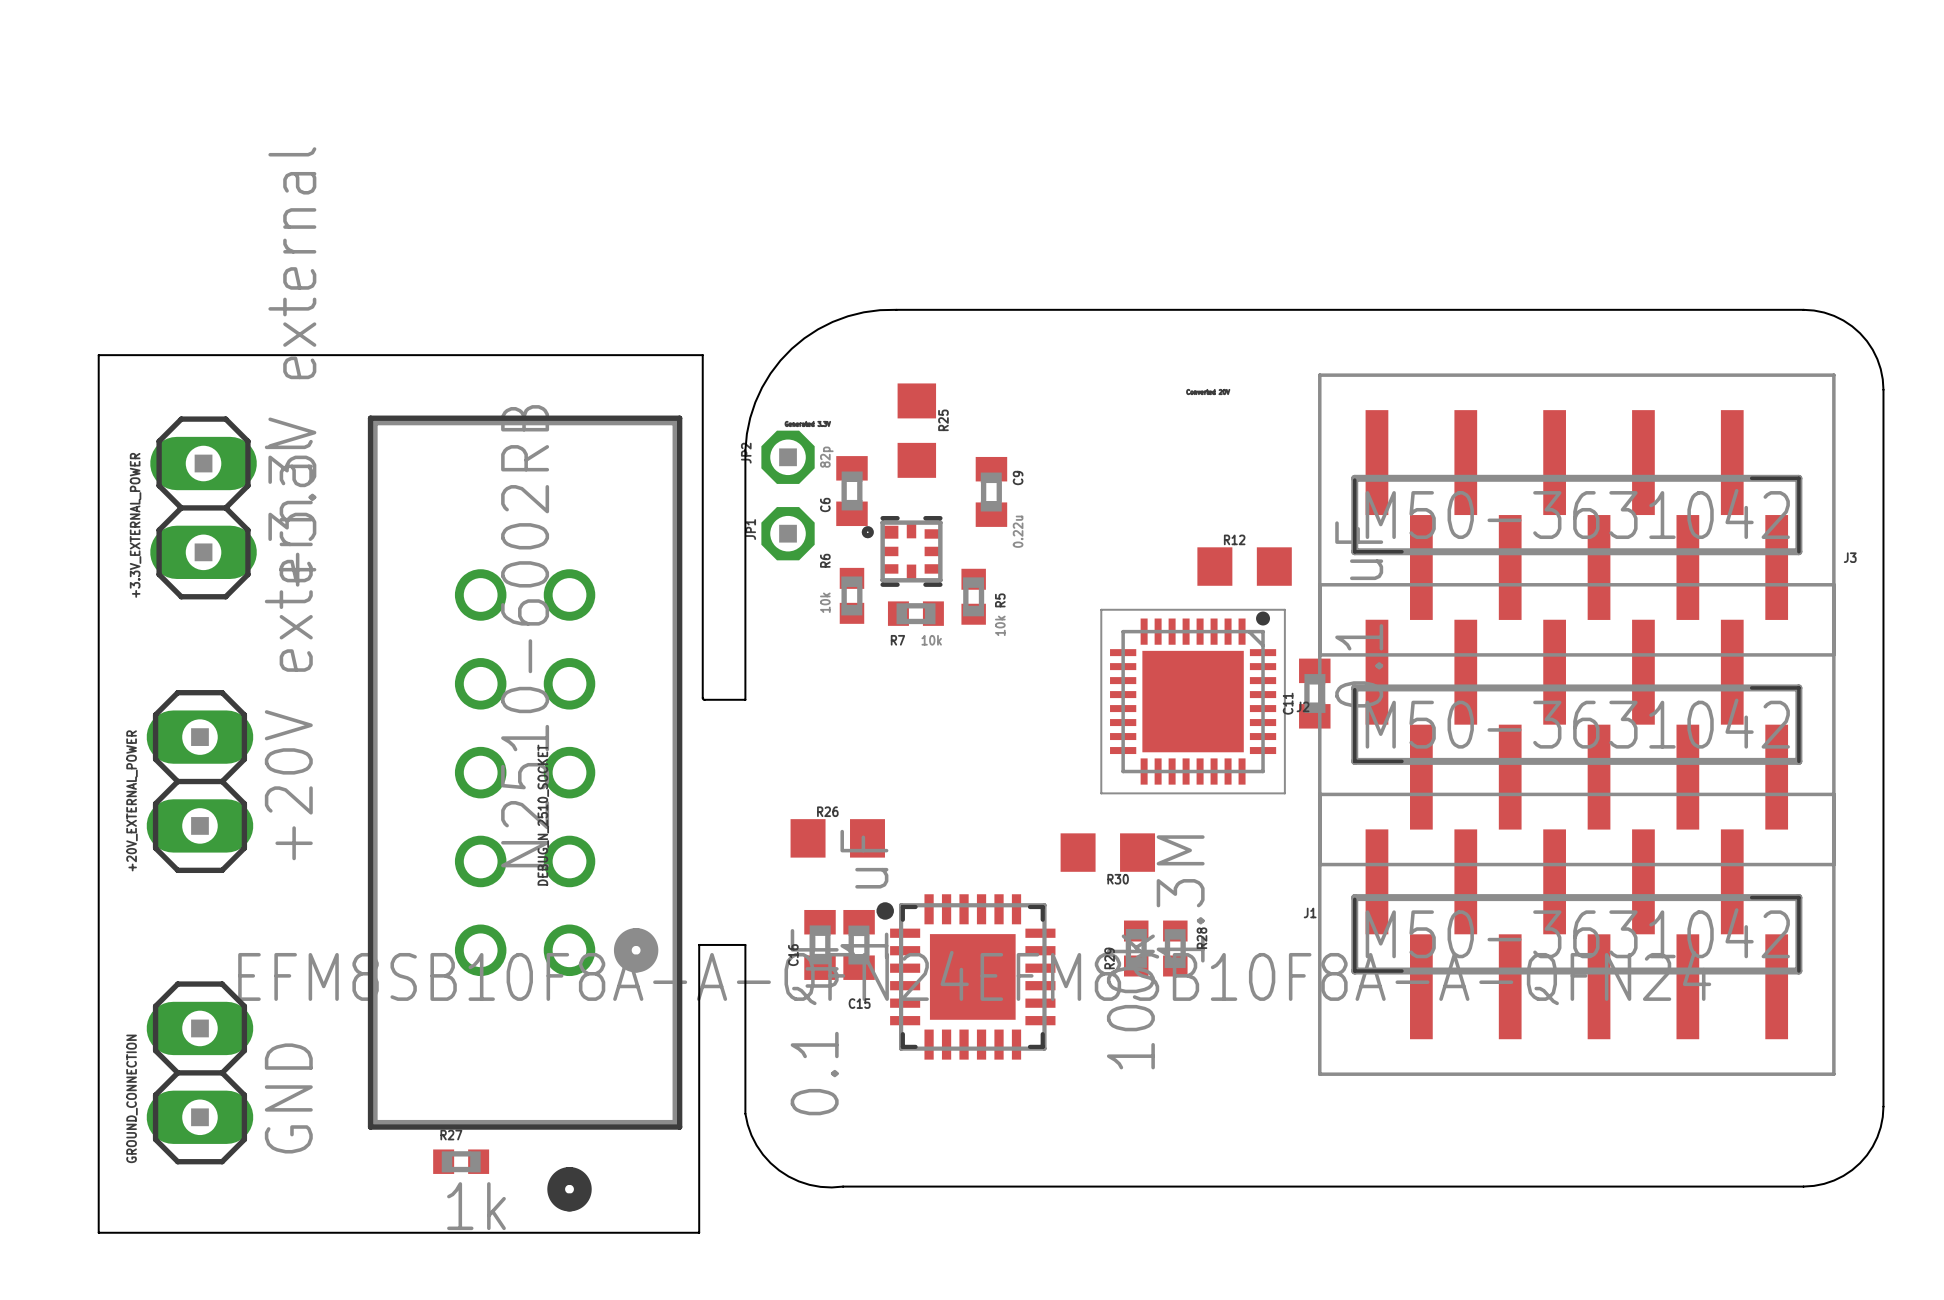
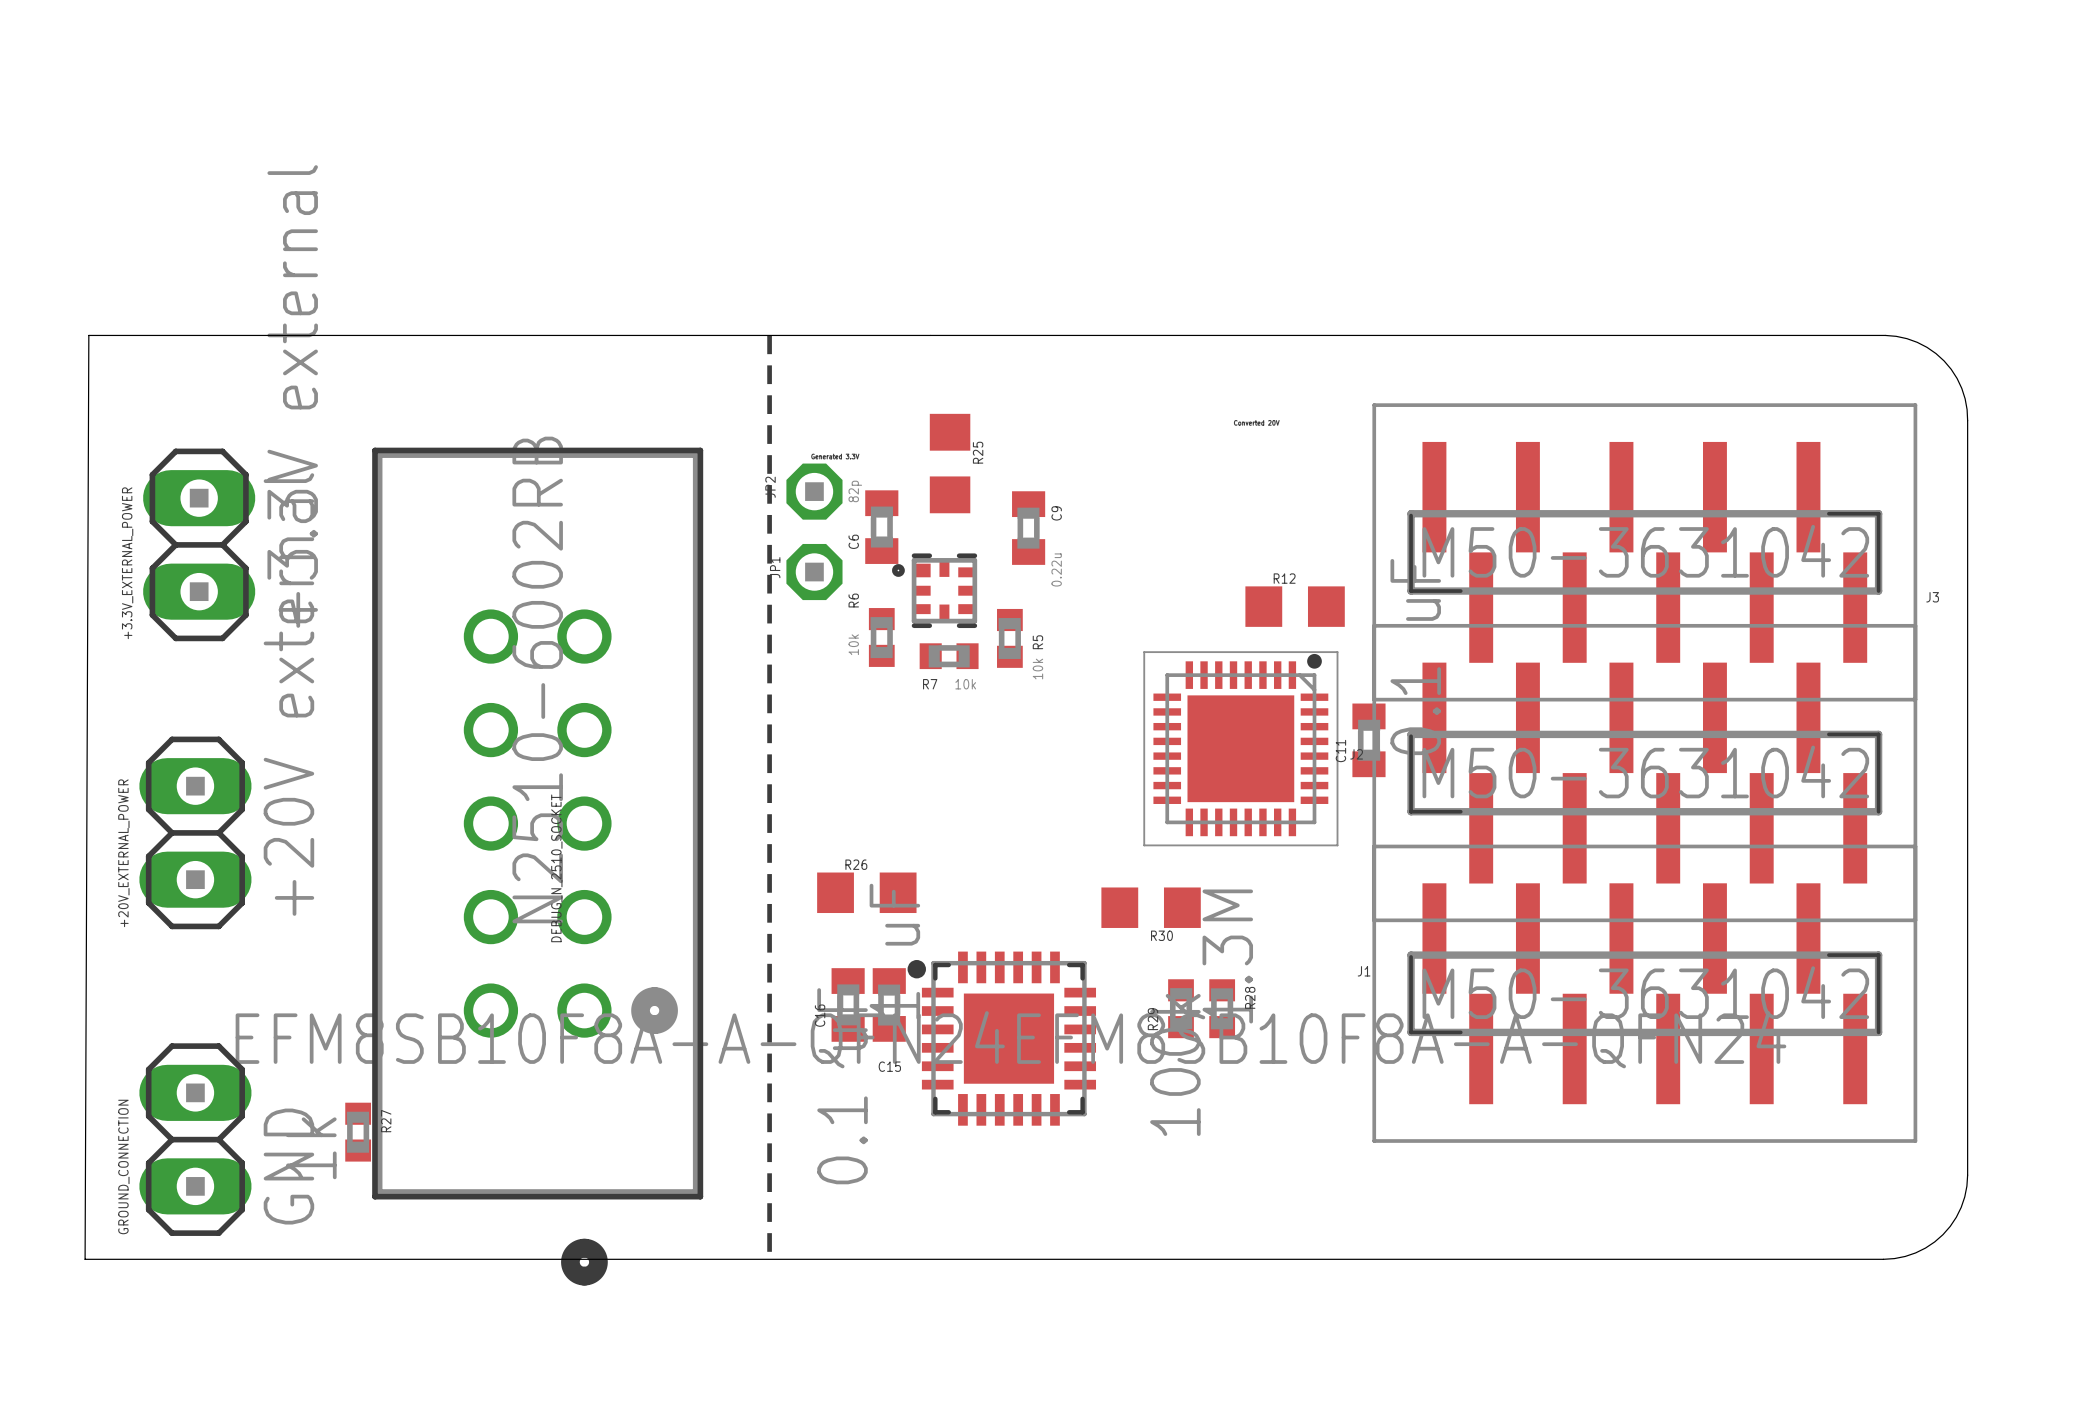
line: none -> (769, 335) (769, 1259)
board edge: (1883, 389) (1877, 359) (1866, 341) (1843, 320) (1813, 310) (896, 309) (880, 310) (847, 316) (818, 329) (791, 348) (770, 373) (755, 402) (750, 417) (745, 450) (745, 699) (704, 699) (702, 698) (702, 355) (98, 355) (98, 1232) (699, 1232) (699, 944) (745, 944) (745, 1113) (756, 1145) (770, 1163) (788, 1176) (809, 1184) (843, 1186) -> (1967, 420) (1961, 388) (1944, 360) (1917, 342) (1885, 335) (88, 335) (85, 1259) (872, 1259)
R27 rotation: 0° (461, 1161) -> 90° clockwise (358, 1132)
R27 position: (461, 1161) -> (358, 1132)

